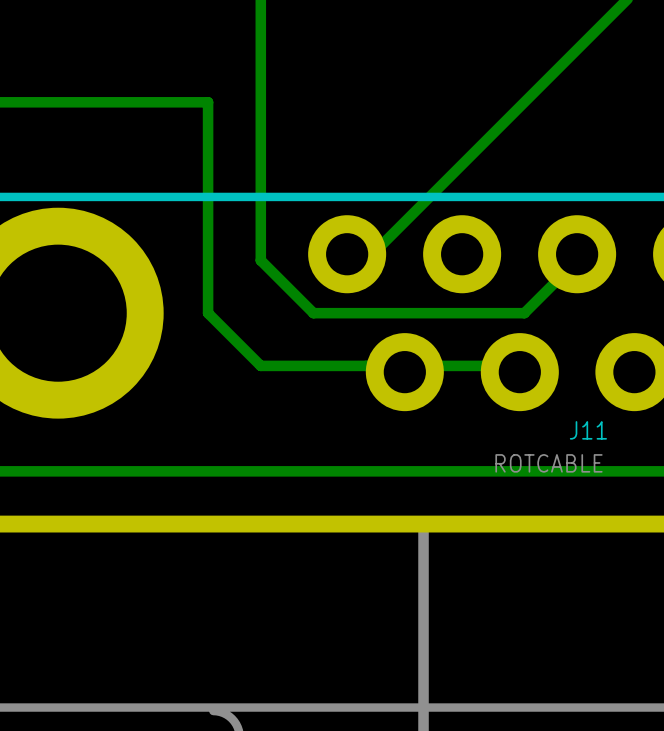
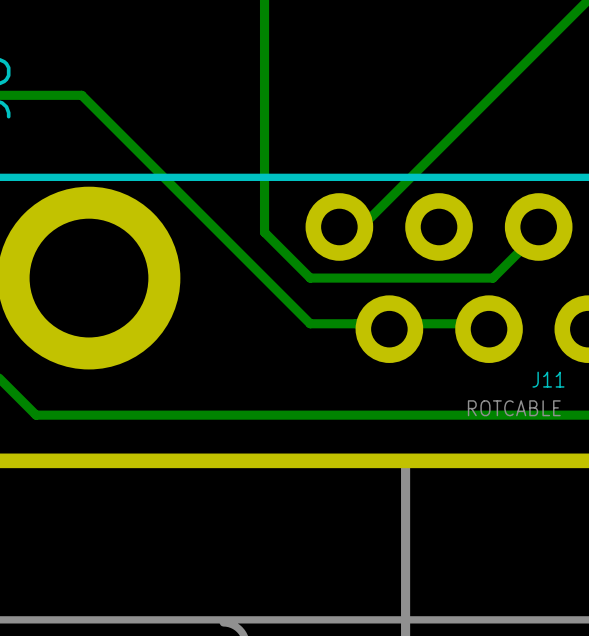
bottom track: (49, 102) (208, 102) (208, 313) (260, 365) (313, 365) -> (81, 95) (310, 323)

